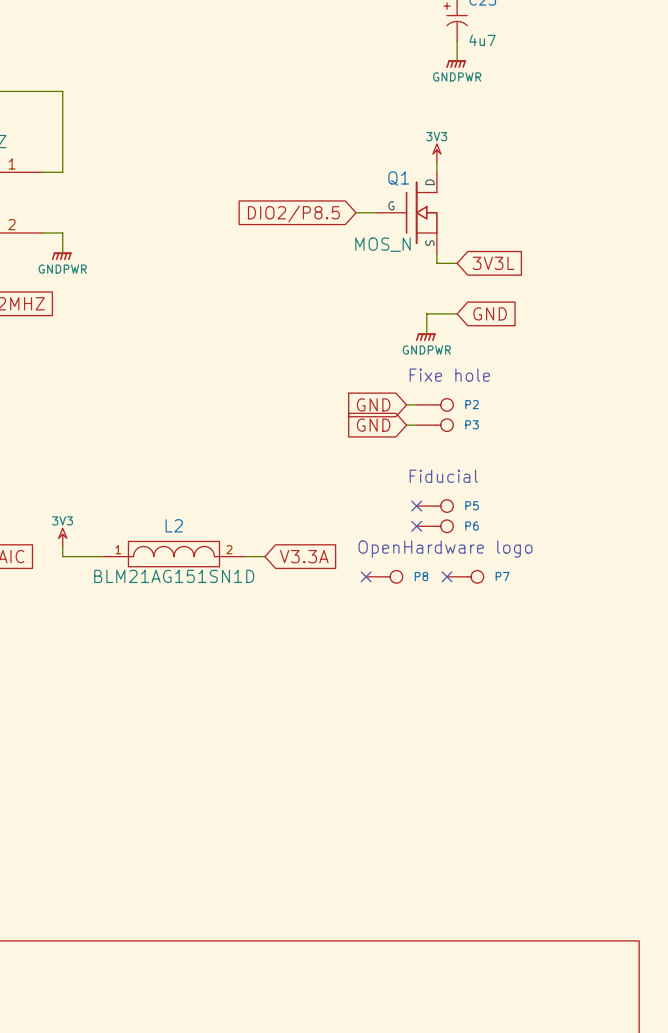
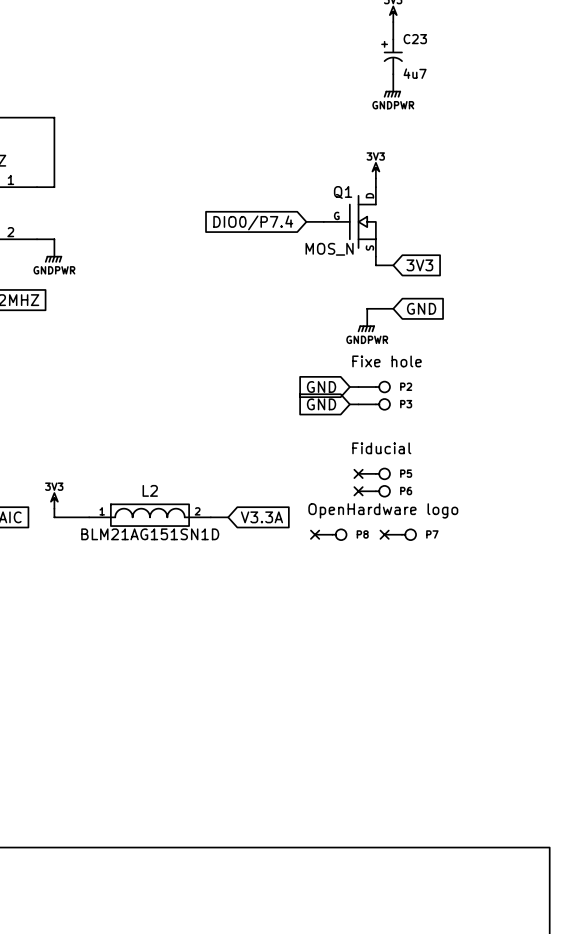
global label: DIO2/P8.5 (293, 213) -> DIO0/P7.4 (253, 222)
global label: 3V3L (493, 263) -> 3V3 (419, 265)

